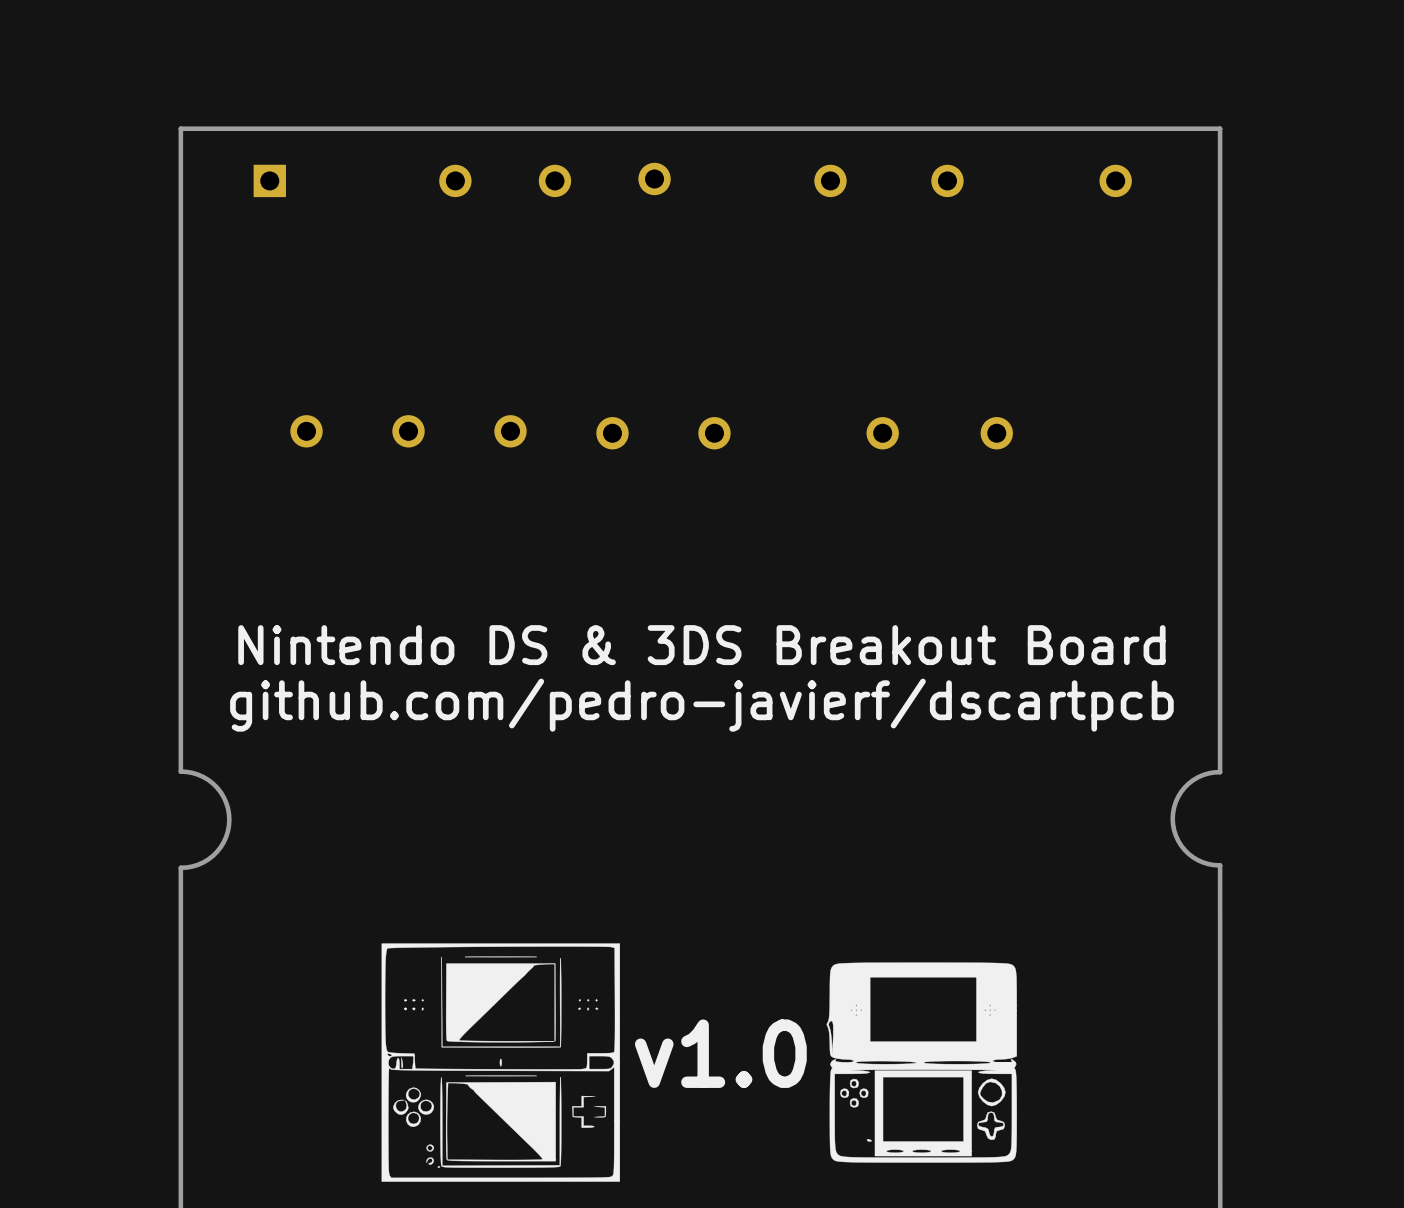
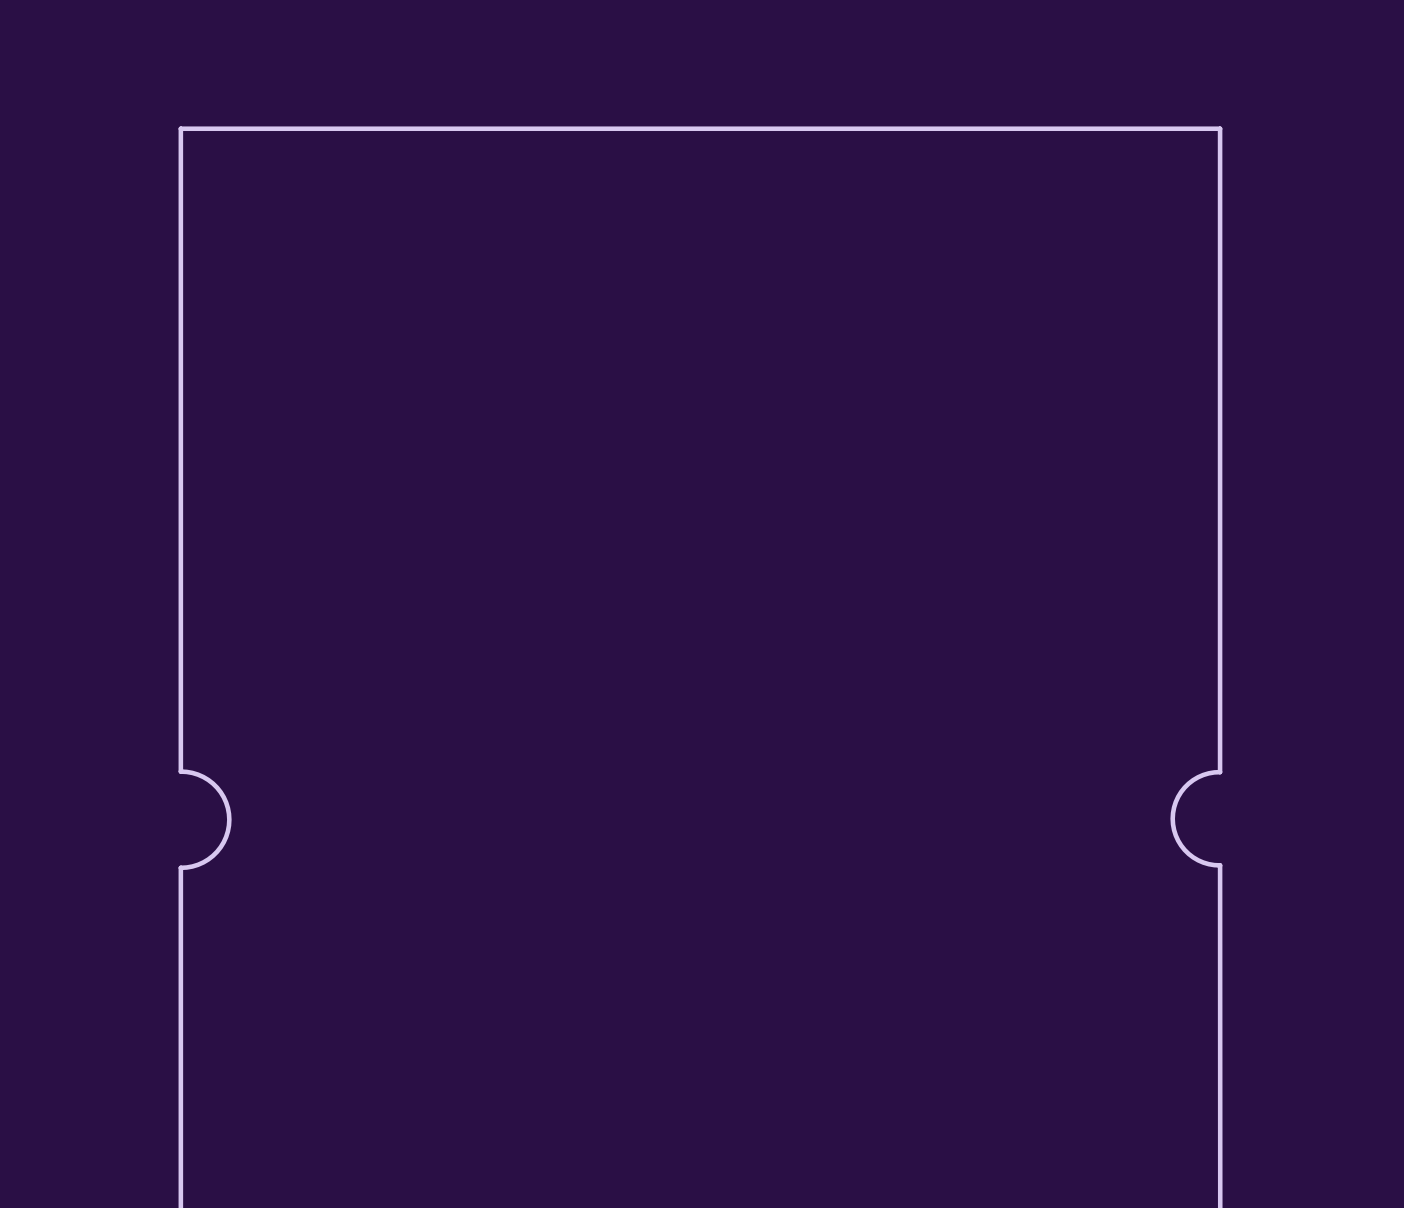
part: (654, 178) -> none
part: (269, 180) -> none
part: (455, 180) -> none
part: (554, 180) -> none
part: (830, 180) -> none
part: (947, 180) -> none
part: (1115, 180) -> none
part: (306, 431) -> none
part: (408, 431) -> none
part: (510, 431) -> none
part: (612, 433) -> none
part: (714, 433) -> none
part: (882, 433) -> none
part: (996, 433) -> none
text: Nintendo DS & 3DS Breakout Board (701, 645) -> none
text: github.com/pedro-javierf/dscartpcb (701, 705) -> none
drawing: [381, 943, 621, 1182] -> none
drawing: [826, 962, 1017, 1163] -> none
text: v1.0 (720, 1053) -> none

